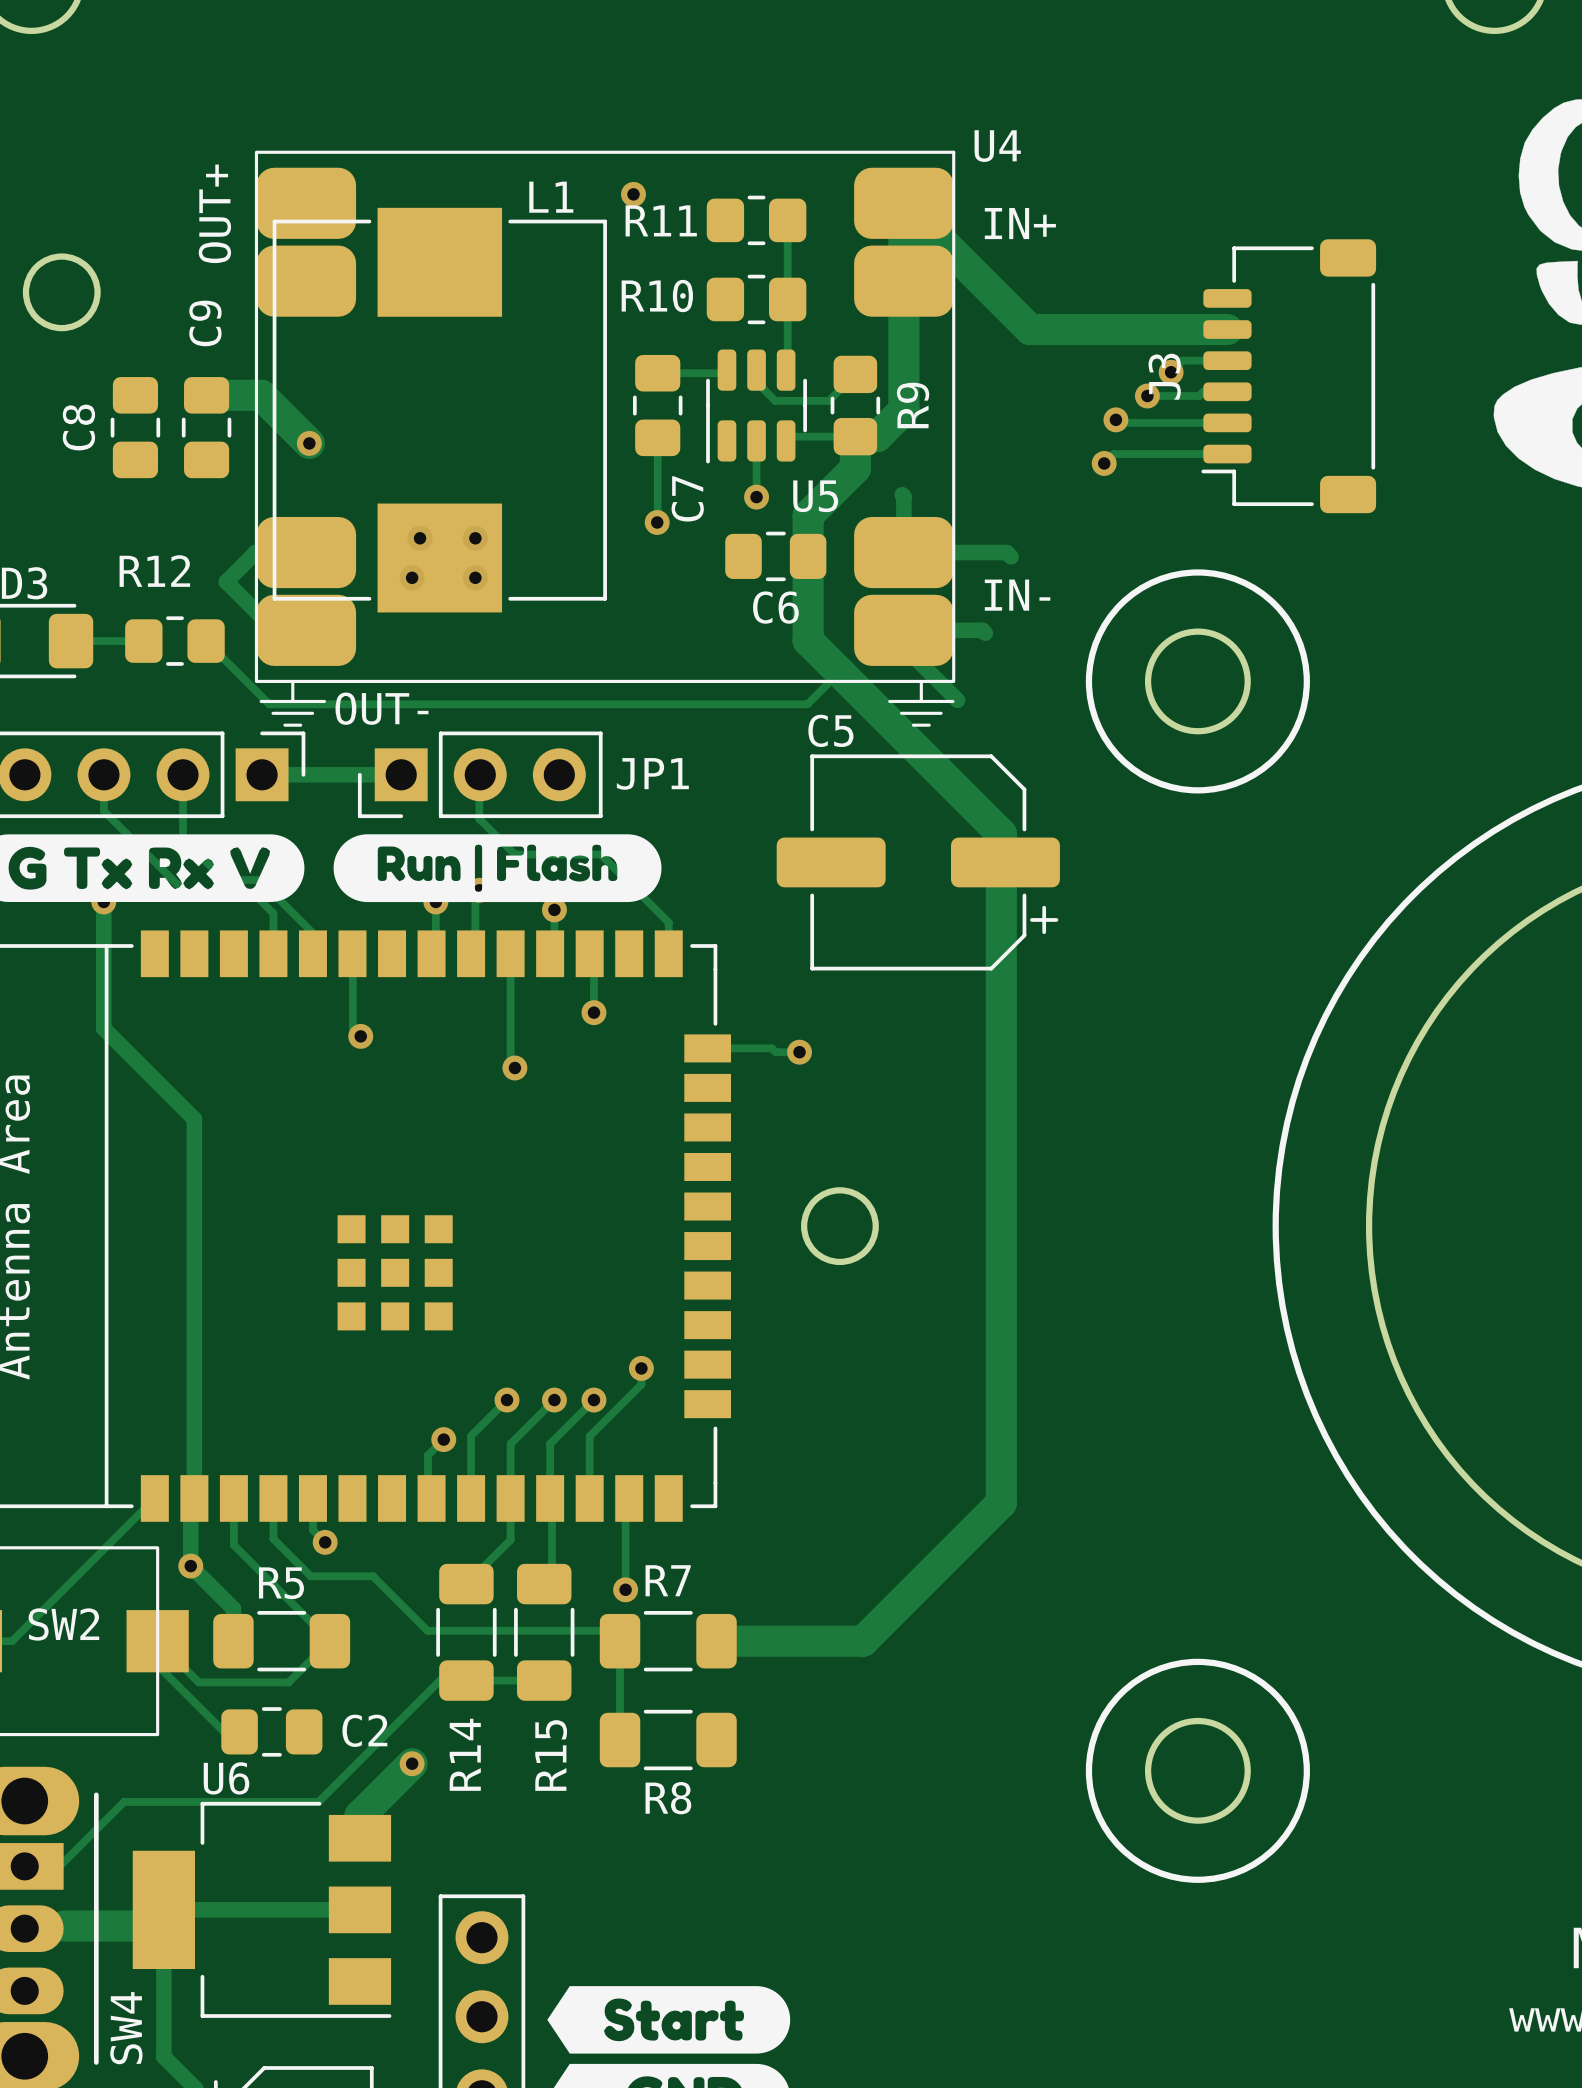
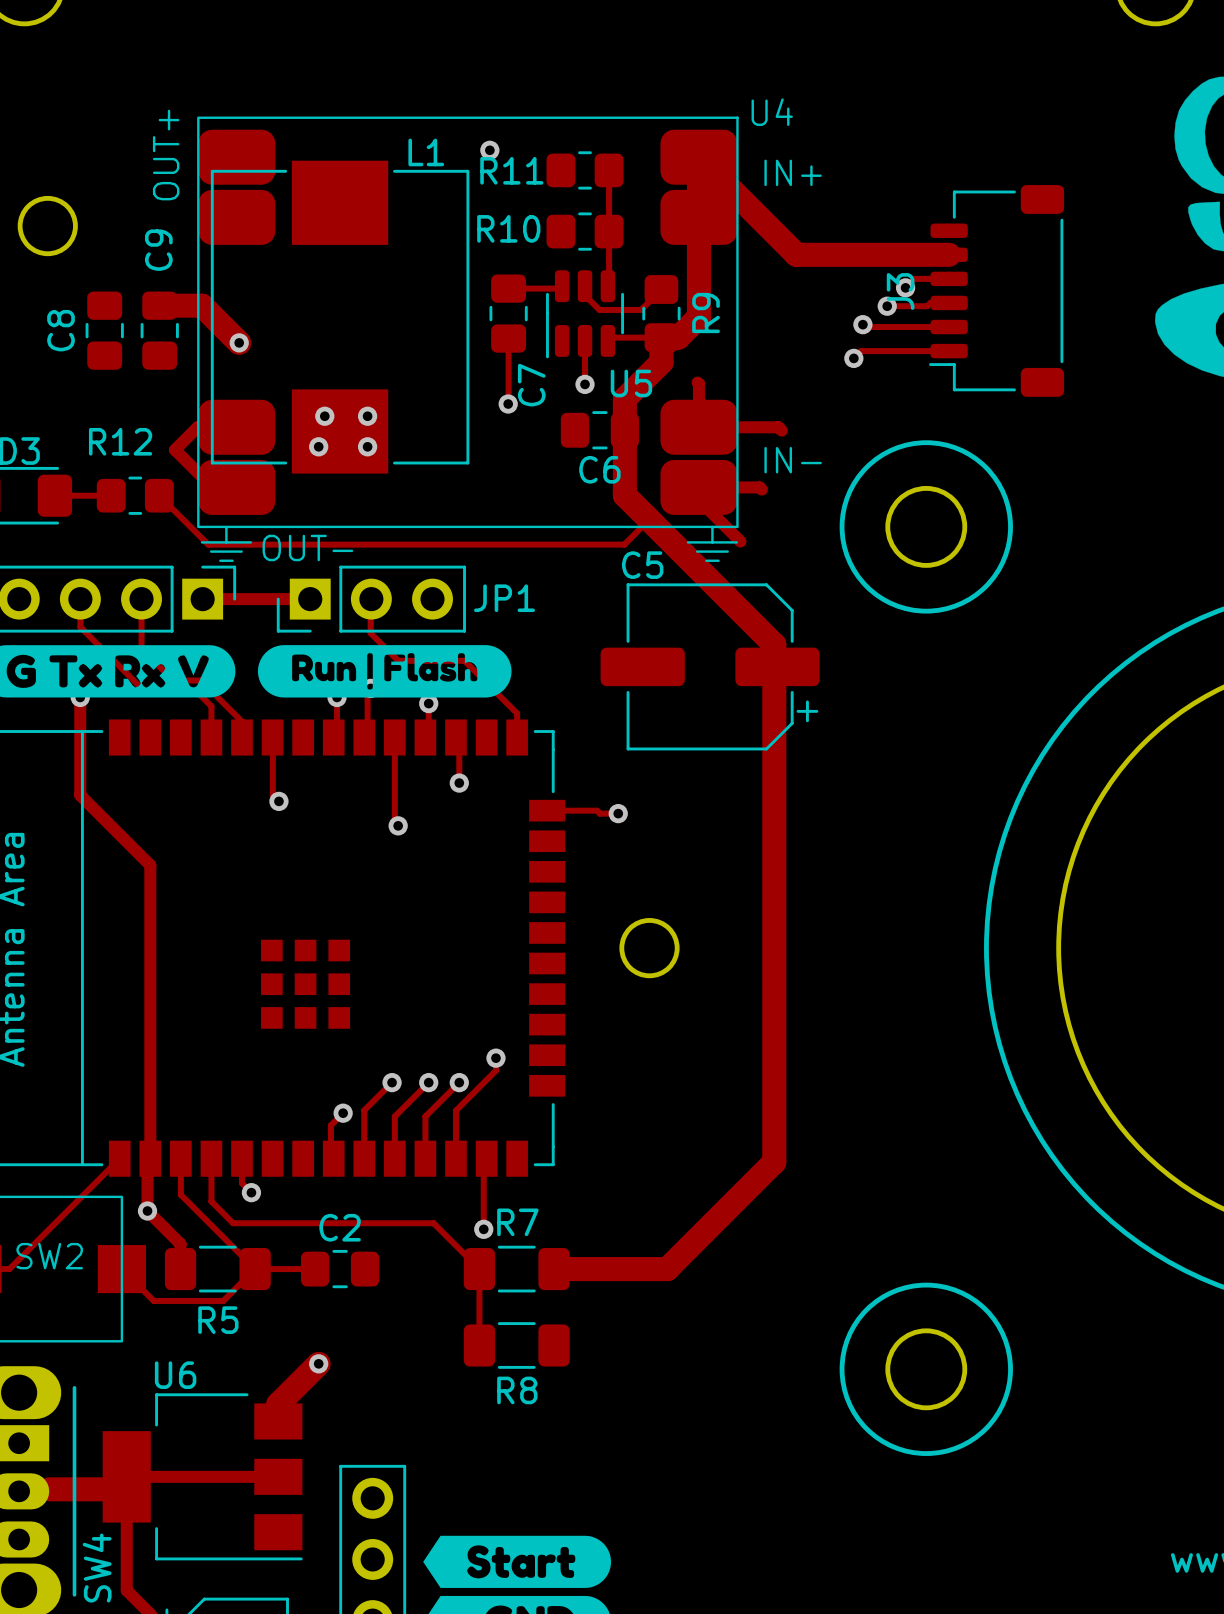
track: (510, 1498) (510, 1539) (466, 1584) -> none
track: (550, 1498) (552, 1500) (552, 1576) (544, 1584) -> none
track: (273, 1538) (310, 1576) (373, 1576) (427, 1630) (609, 1630) -> (211, 1190) (211, 1201) (233, 1223) (433, 1223) (471, 1261)
R5 name position: R5 (281, 1583) -> R5 (218, 1320)
R14: (466, 1632) -> none
R15: (544, 1632) -> none
track: (157, 1641) (157, 1665) (224, 1731) (239, 1731) -> none
track: none -> (255, 1269) (315, 1269)
track: (544, 1680) (439, 1680) (318, 1801) (124, 1801) (59, 1866) (24, 1866) -> none
C2 name position: C2 (364, 1730) -> C2 (340, 1227)
C2 position: (271, 1731) -> (340, 1269)

